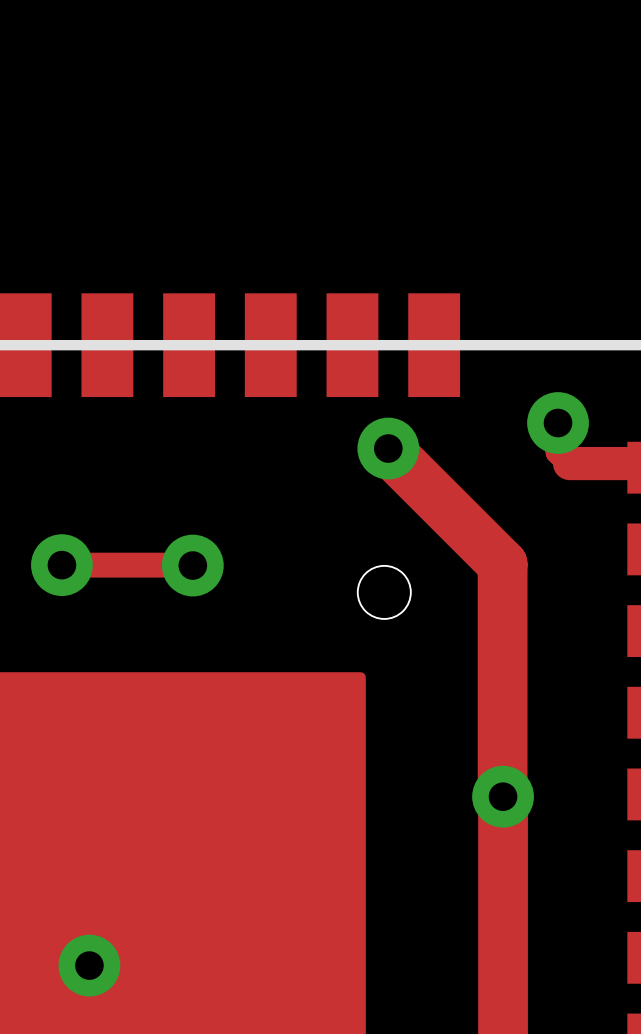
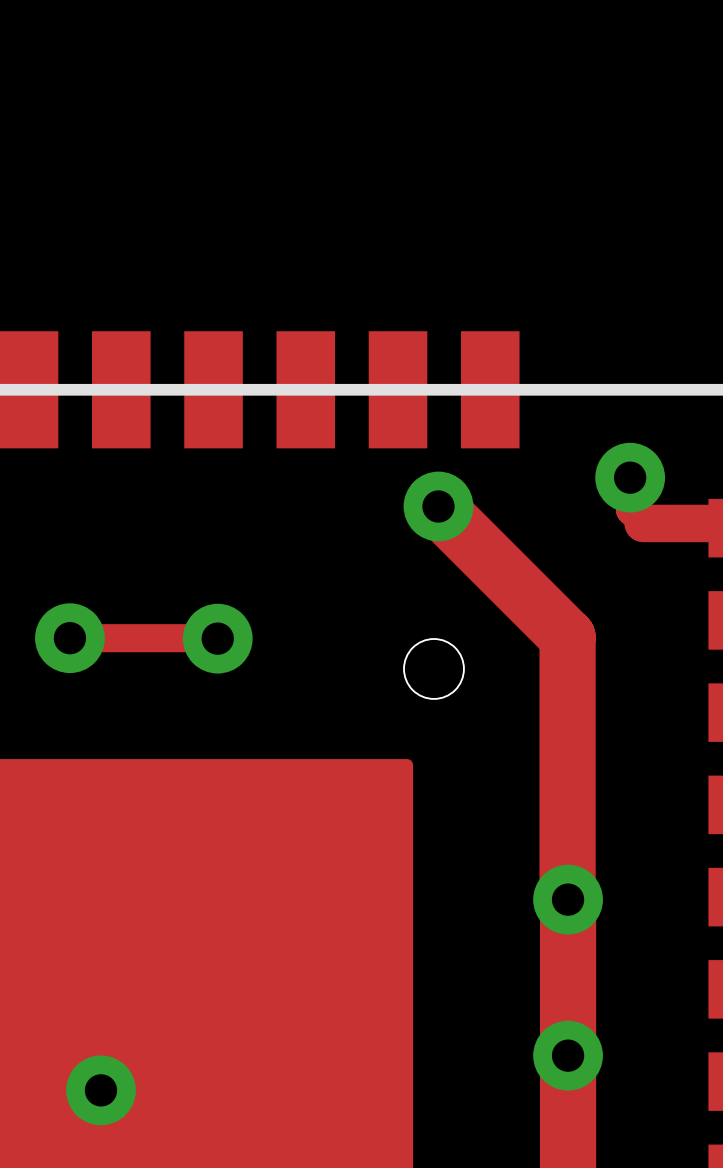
via: none -> (568, 1055)

